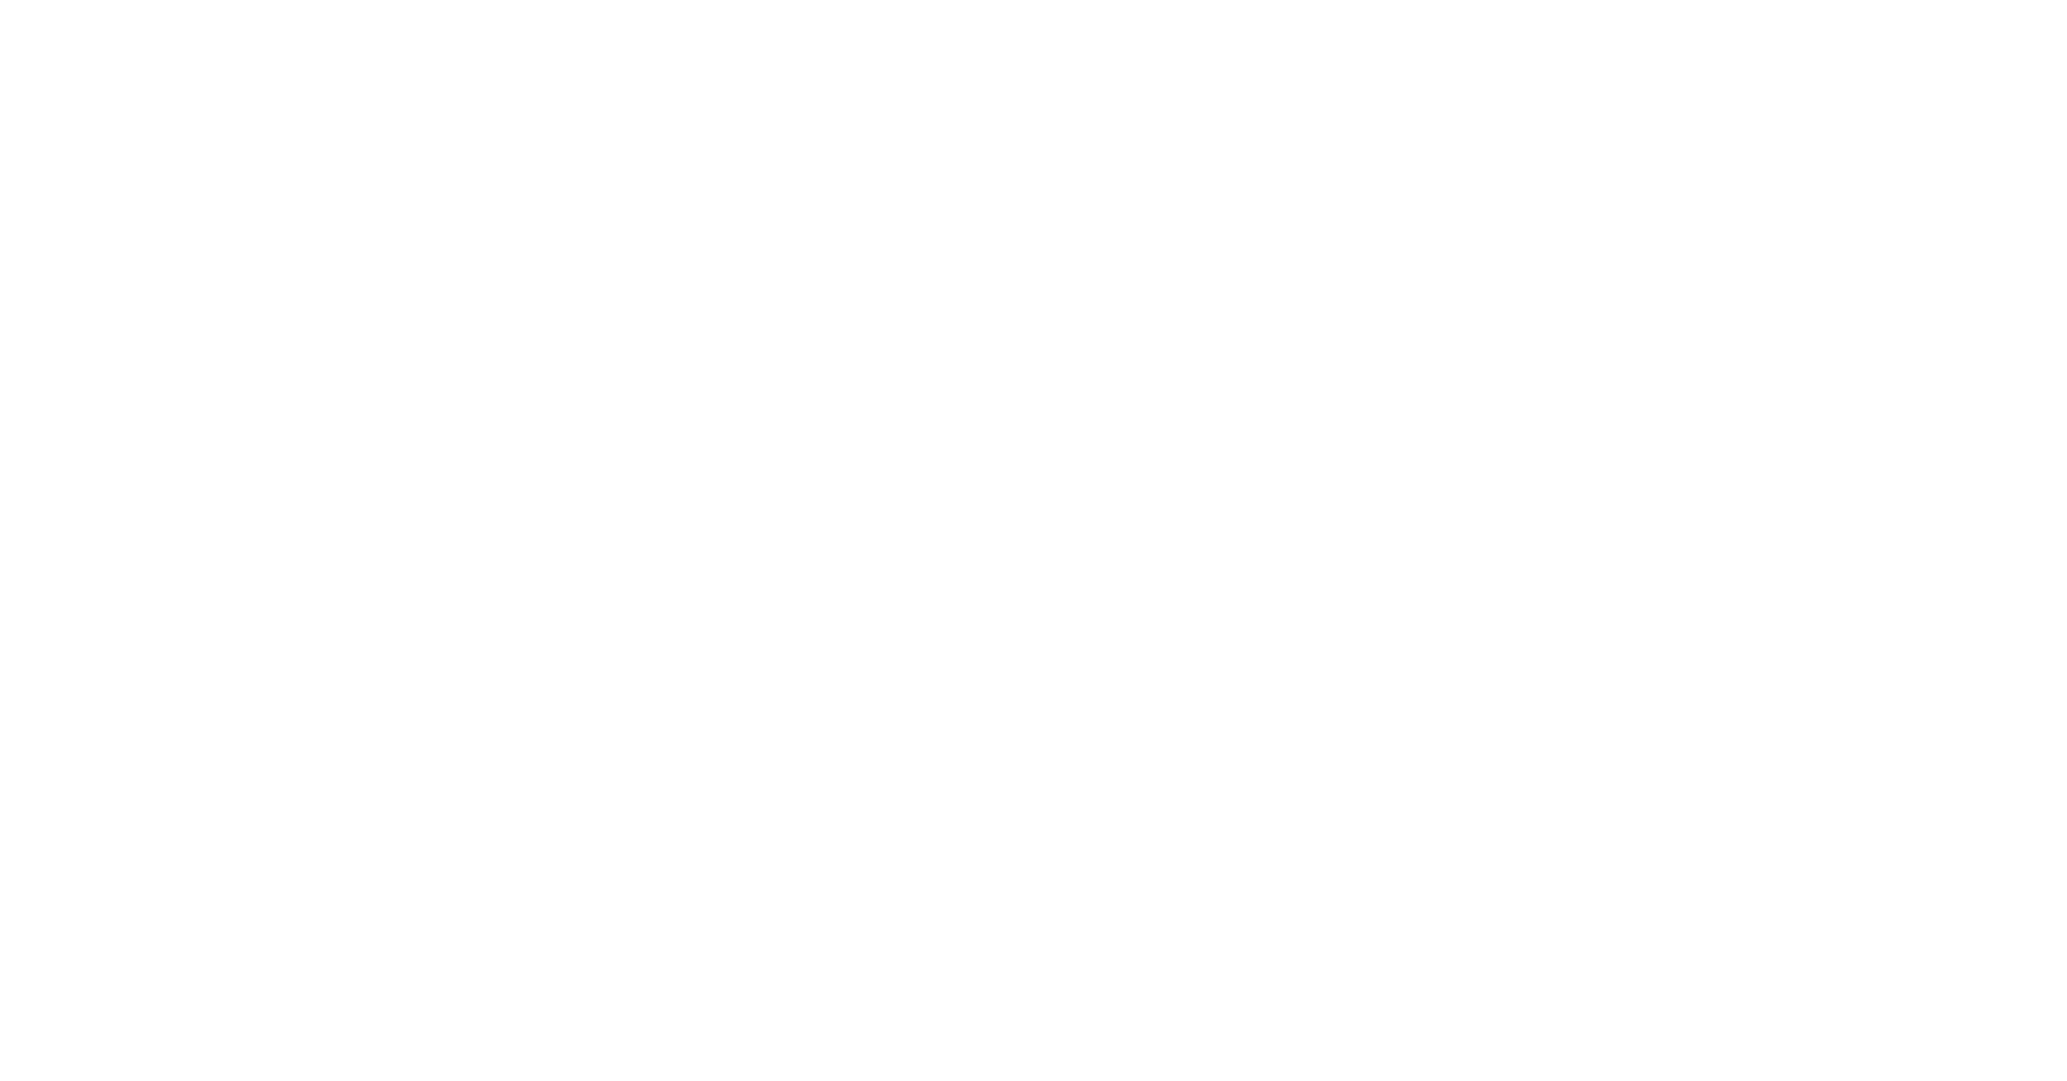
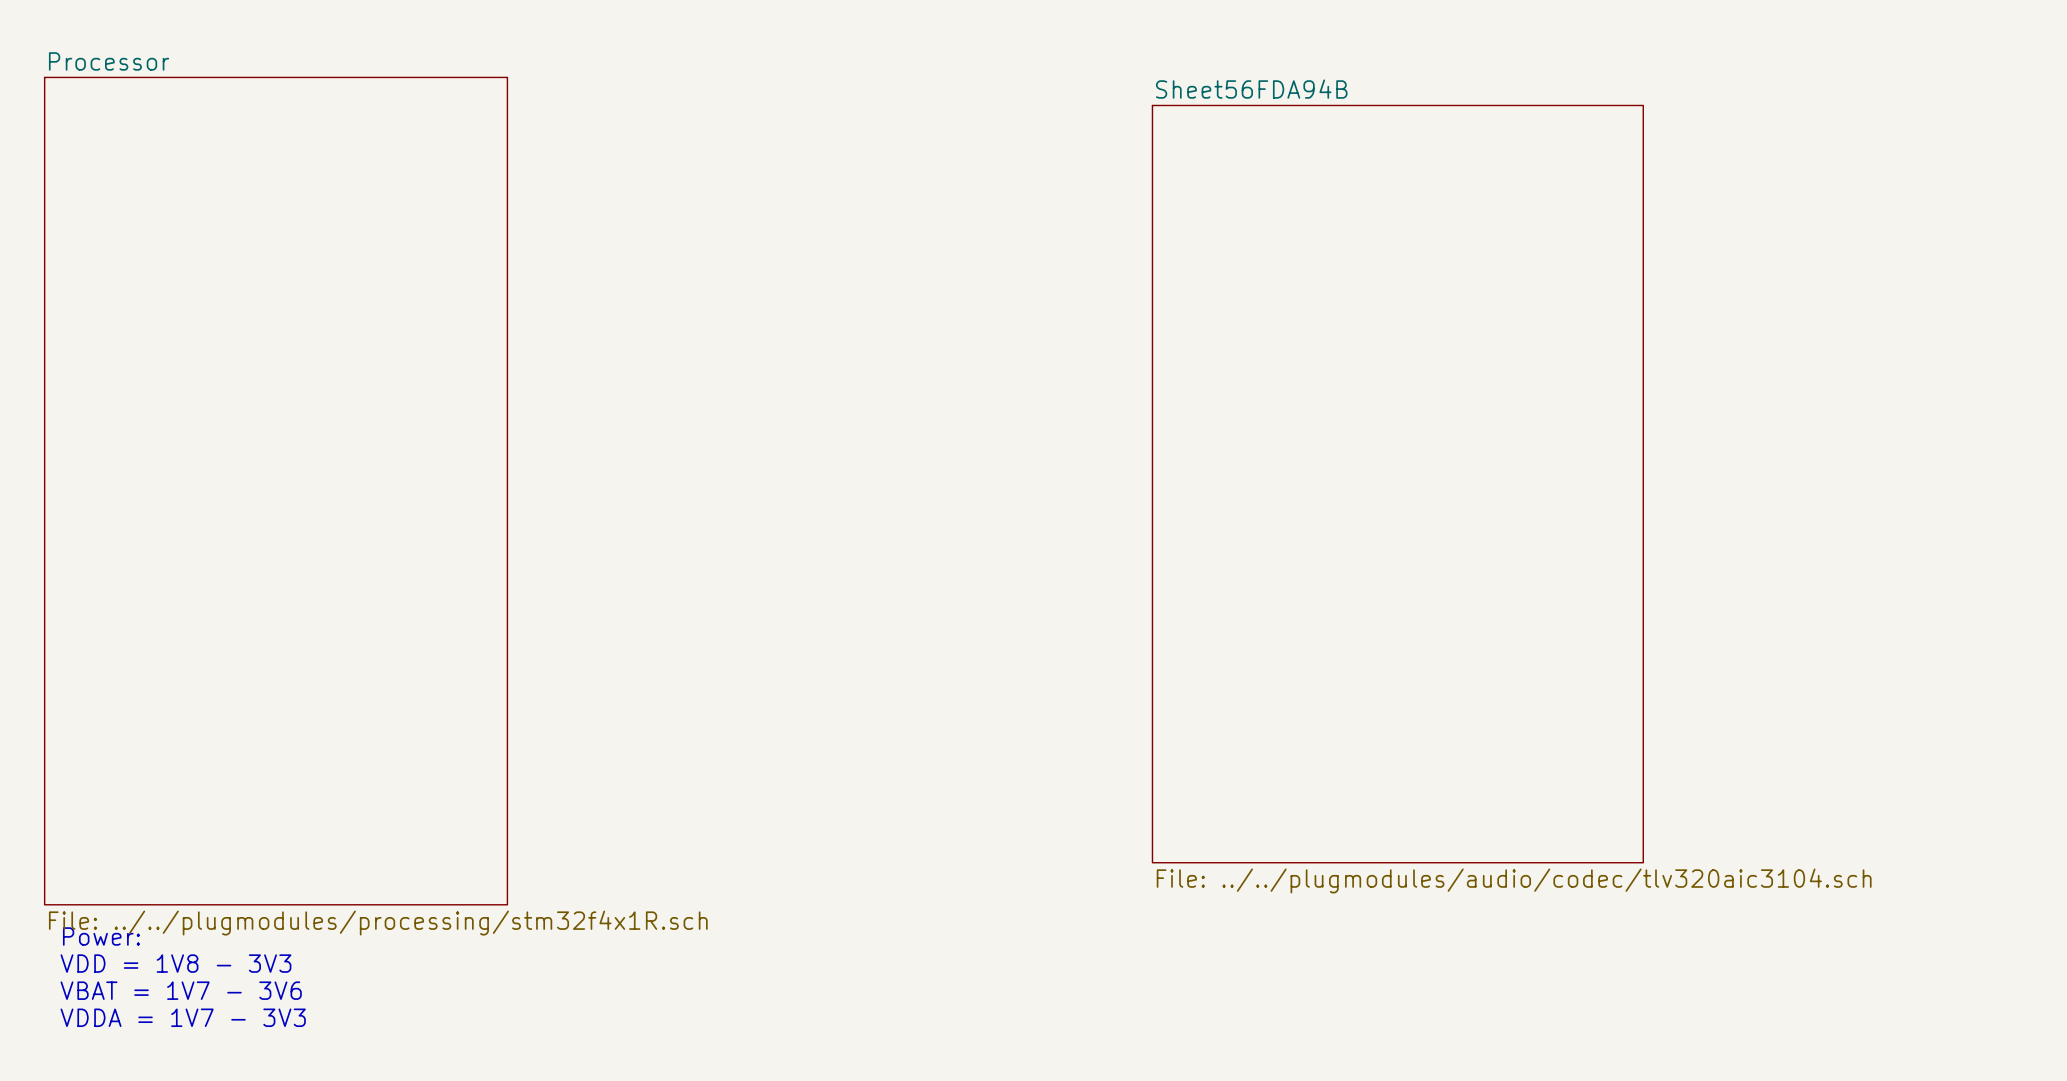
sheet Sheet56FDA94B: none -> File: ../../plugmodules/audio/codec/tlv320aic3104.sch (1397, 484)
sheet Processor: none -> File: ../../plugmodules/processing/stm32f4x1R.sch (276, 491)
text: none -> Power: (101, 936)
text: none -> VDD = 1V8 - 3V3 (175, 963)
text: none -> VBAT = 1V7 - 3V6 (181, 990)
text: none -> VDDA = 1V7 - 3V3 (183, 1017)

